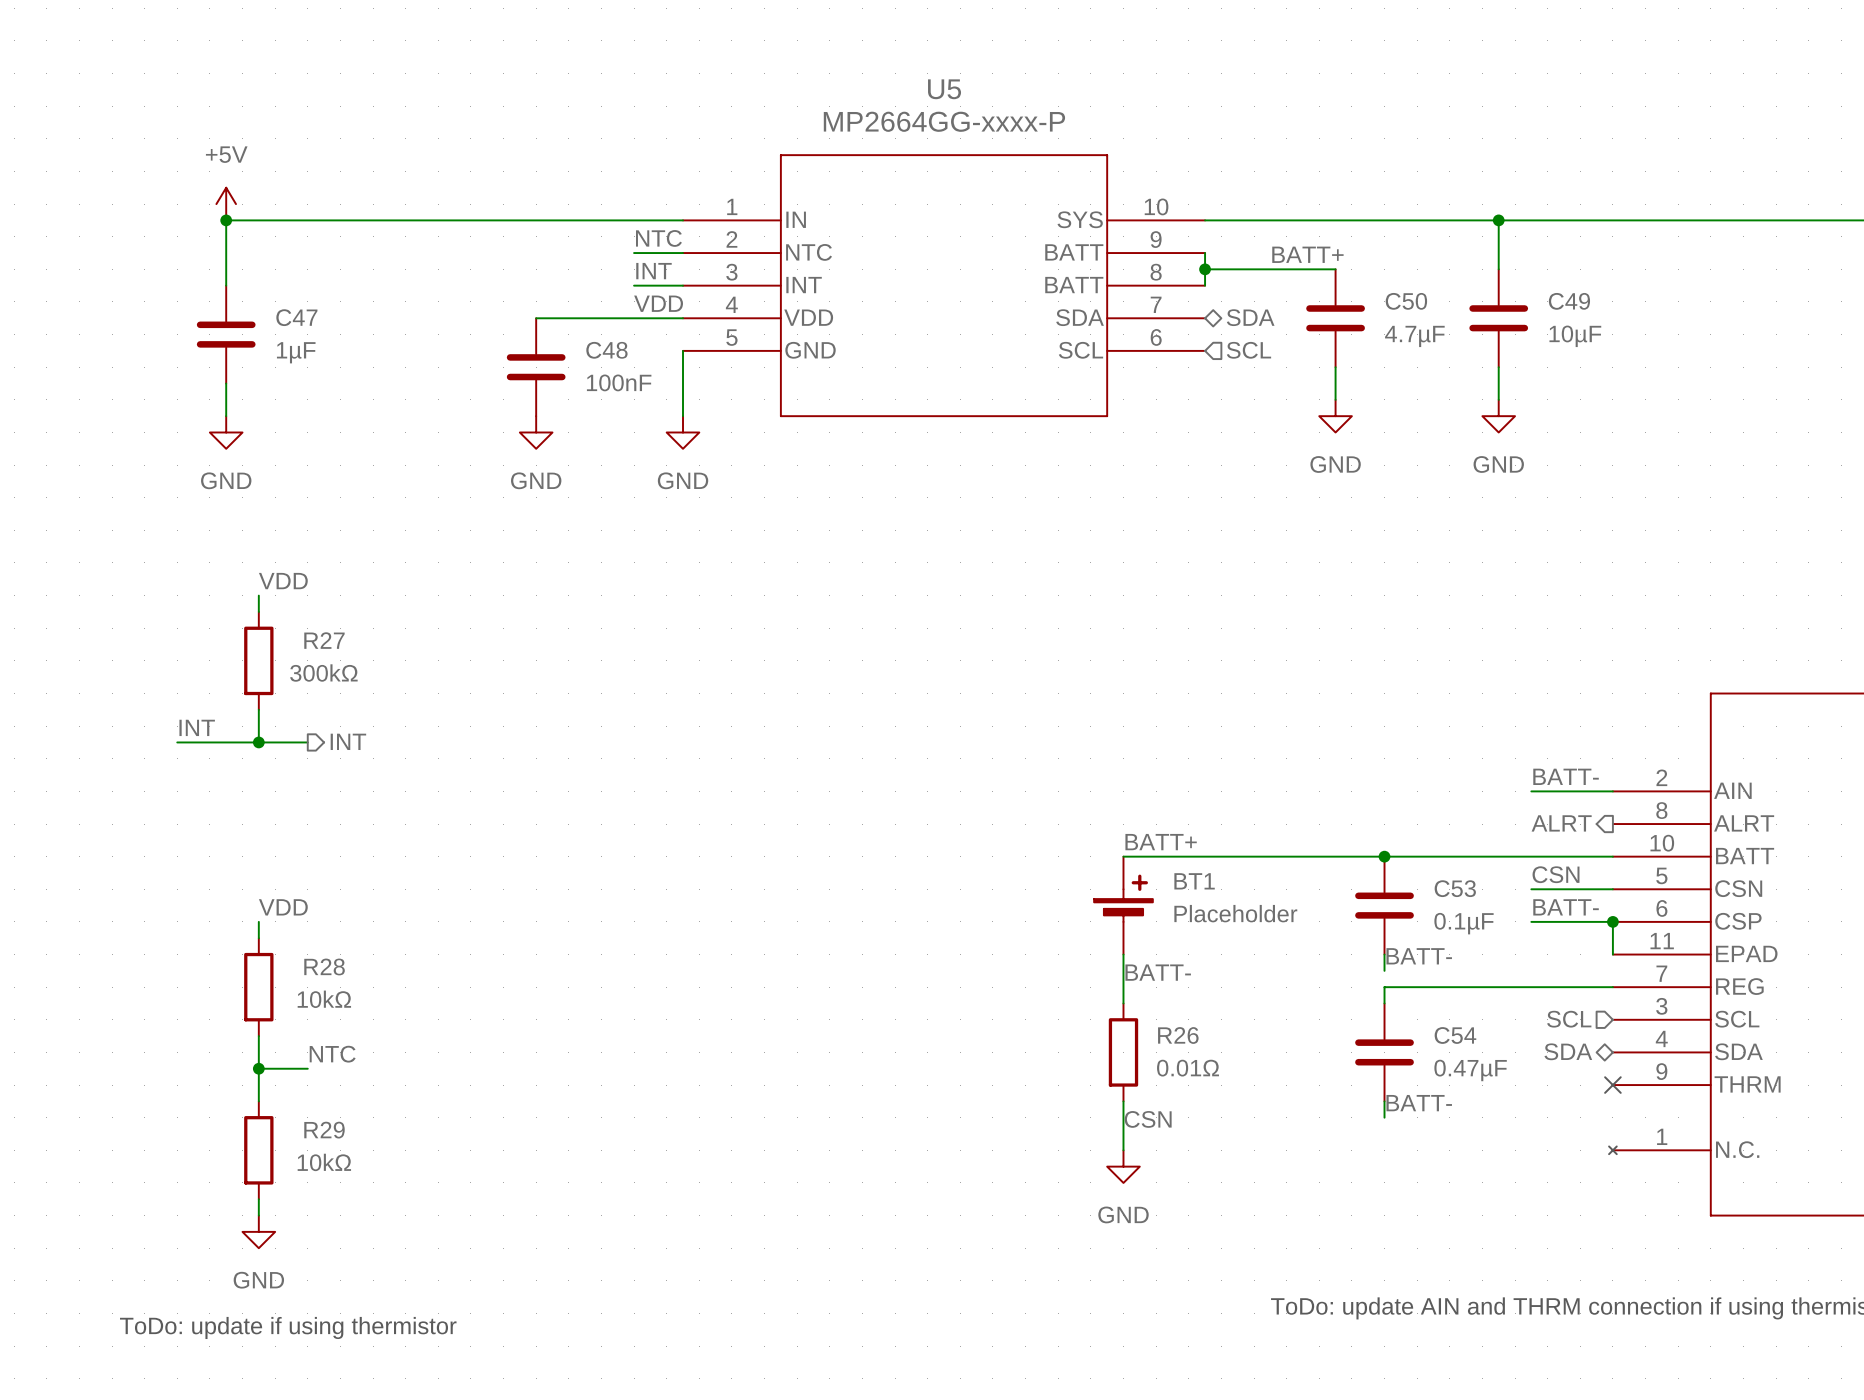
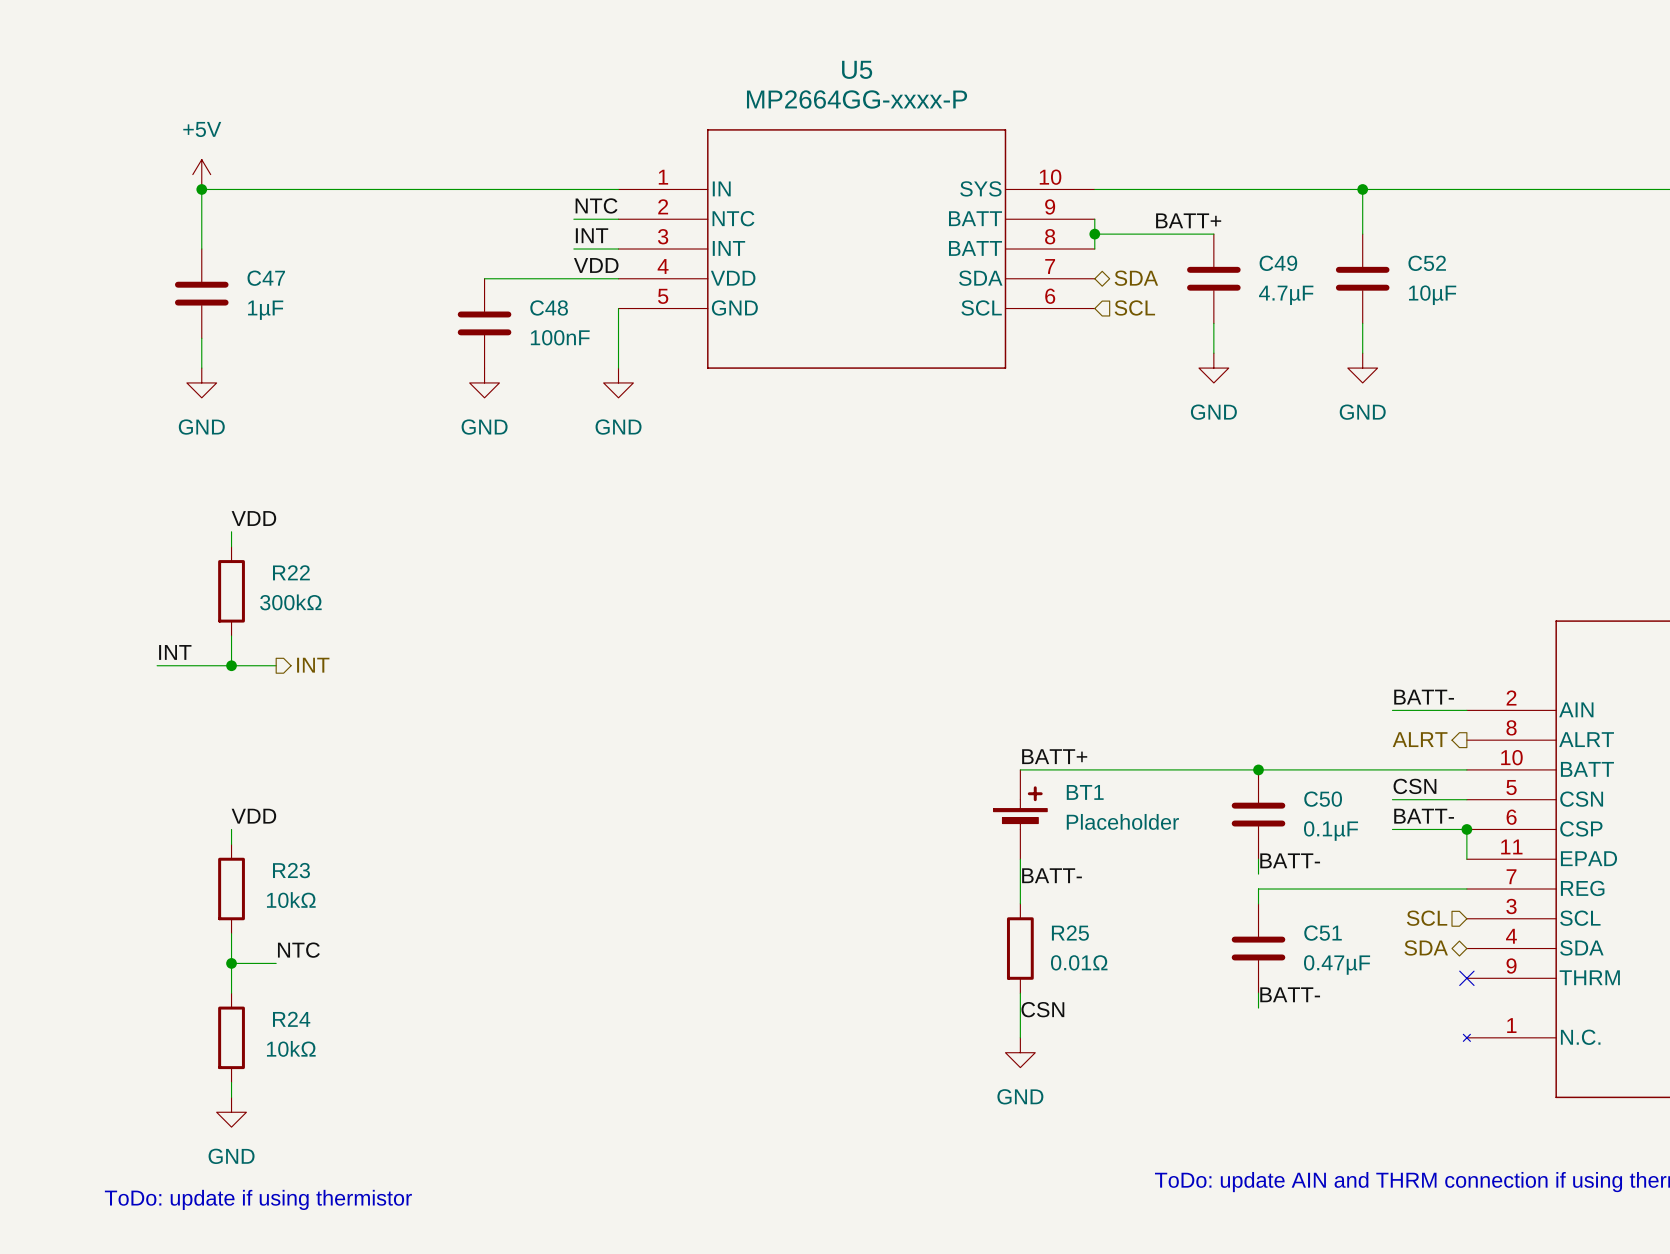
C50 name: C50 (1406, 301) -> C49 (1278, 263)
C49 name: C49 (1569, 301) -> C52 (1427, 263)
R27 name: R27 (324, 640) -> R22 (291, 572)
C53 name: C53 (1455, 888) -> C50 (1323, 799)
R28 name: R28 (324, 966) -> R23 (291, 870)
R26 name: R26 (1178, 1035) -> R25 (1070, 933)
C54 name: C54 (1455, 1035) -> C51 (1323, 933)
R29 name: R29 (324, 1130) -> R24 (291, 1019)

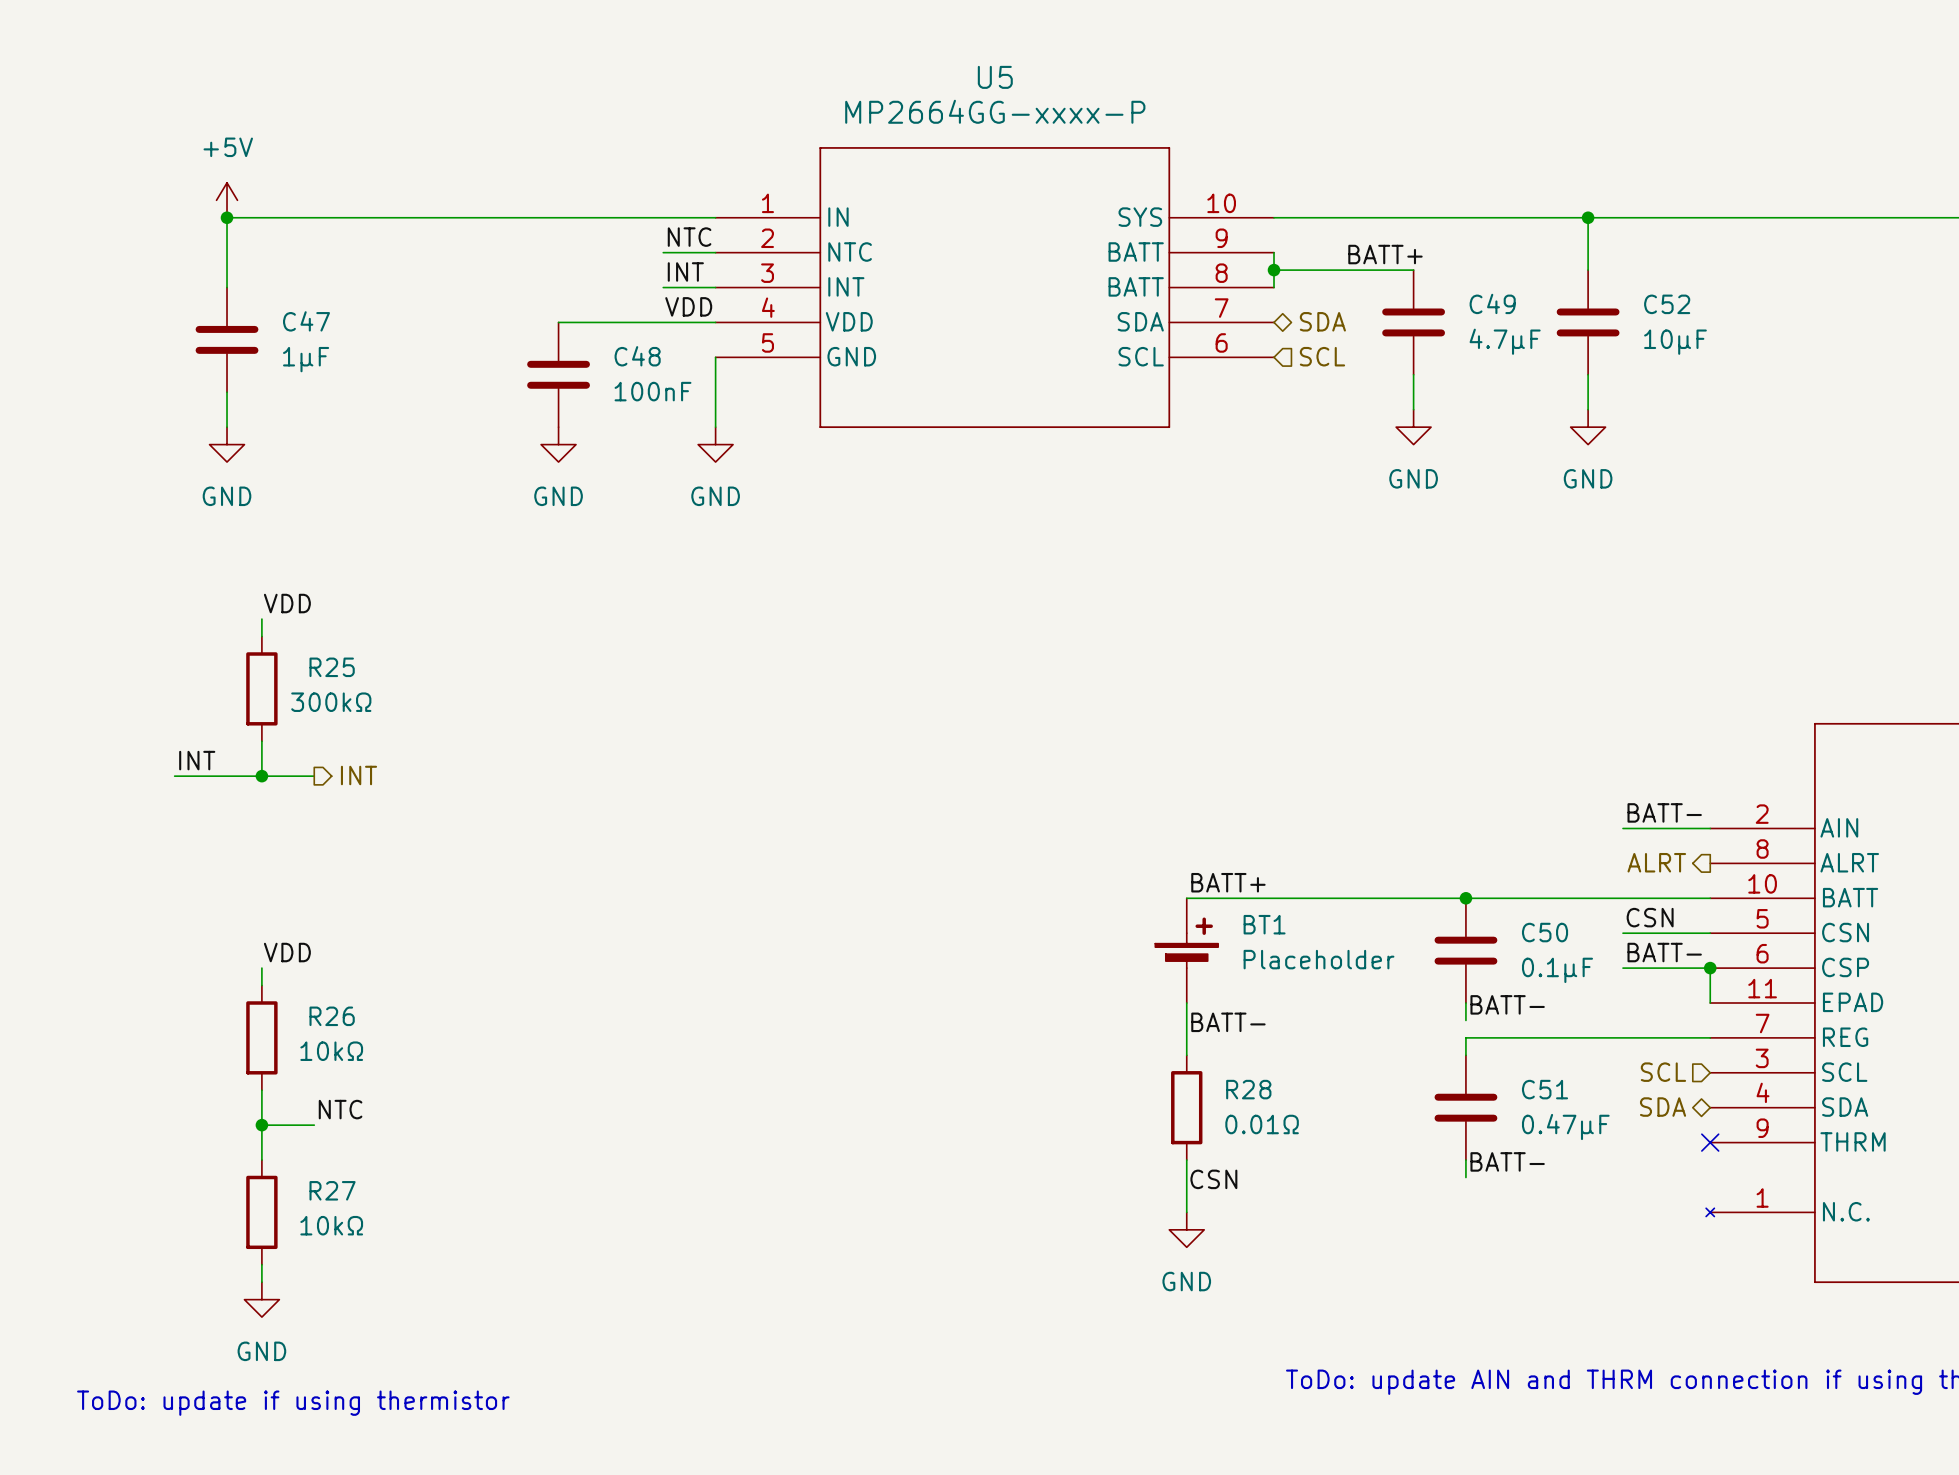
R22 name: R22 (291, 572) -> R25 (332, 667)
R23 name: R23 (291, 870) -> R26 (332, 1016)
R25 name: R25 (1070, 933) -> R28 (1248, 1089)
R24 name: R24 (291, 1019) -> R27 (332, 1190)

